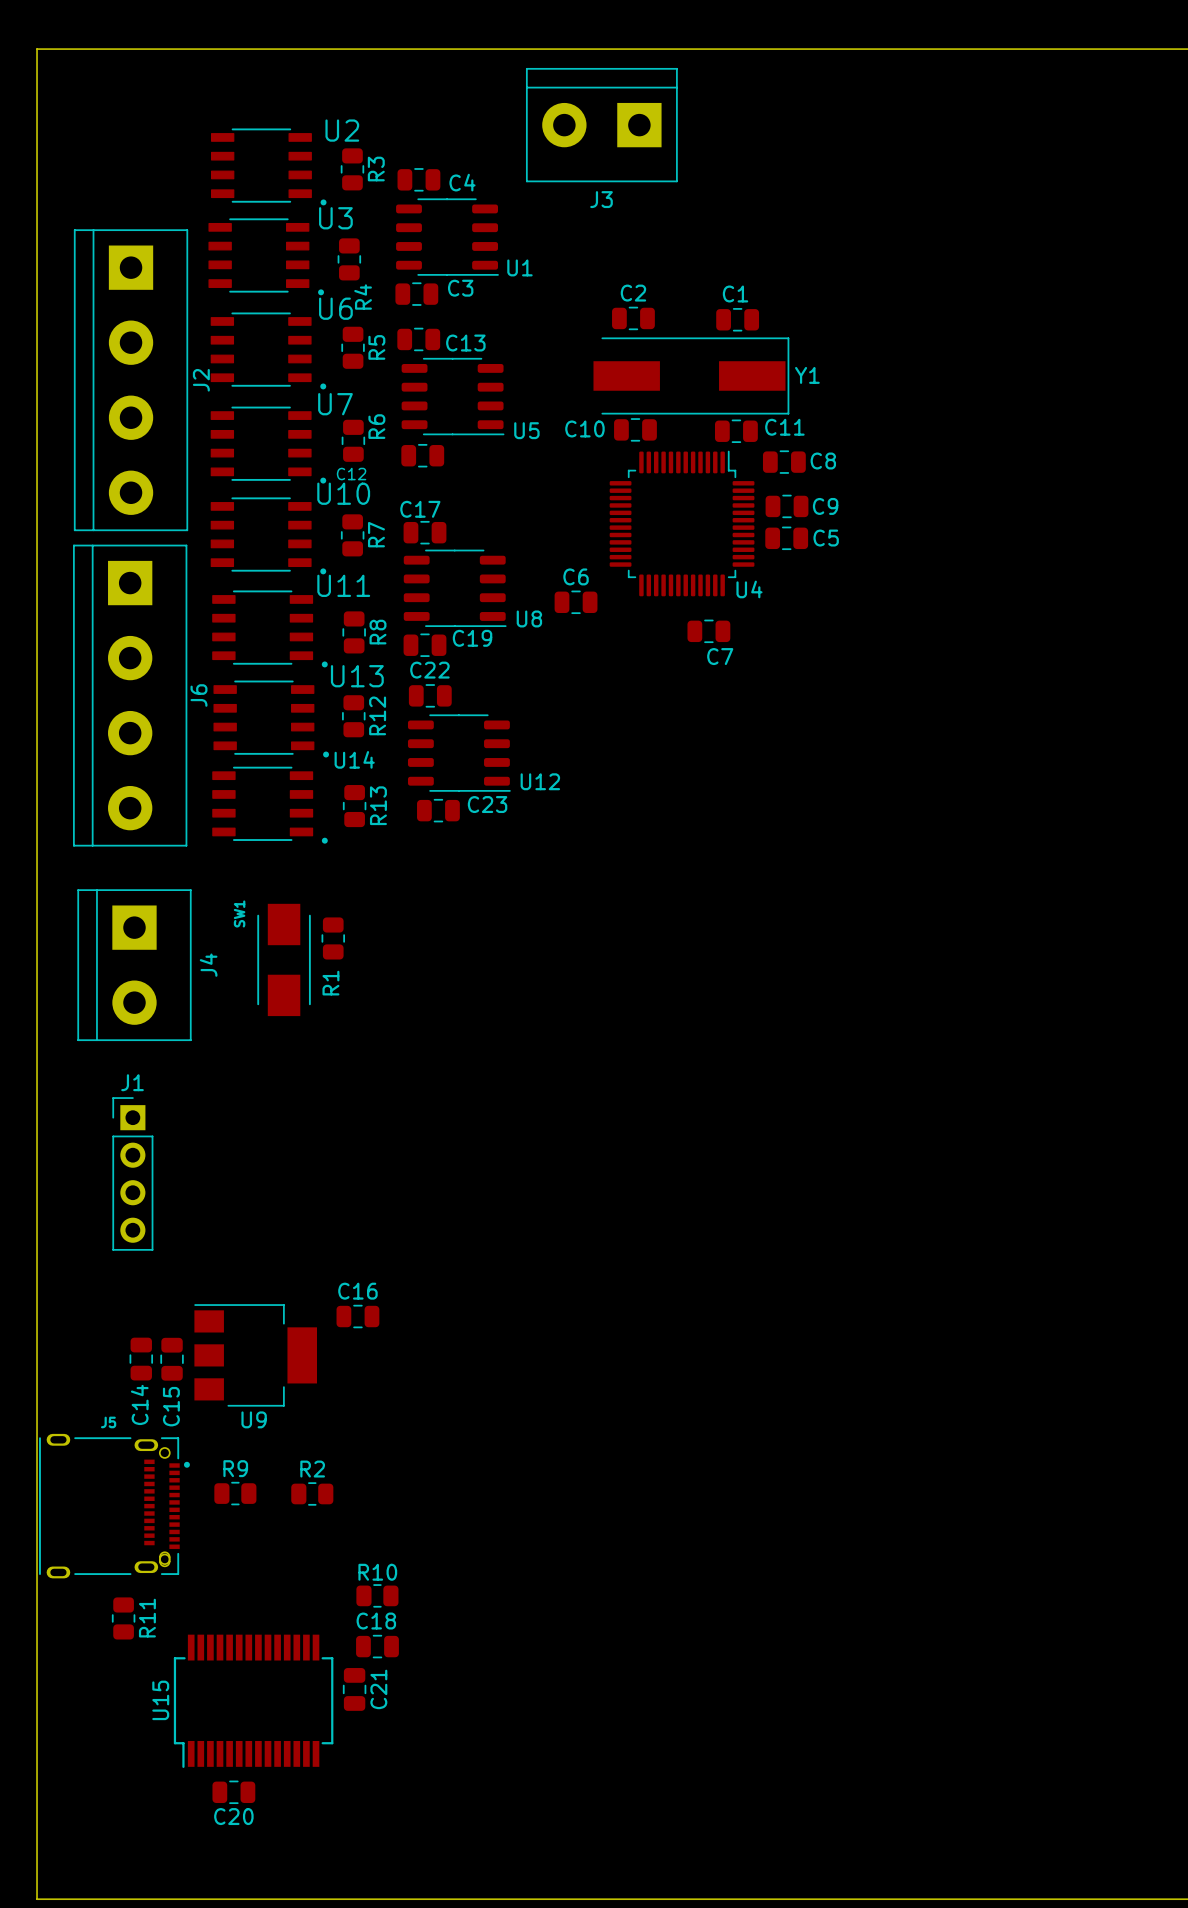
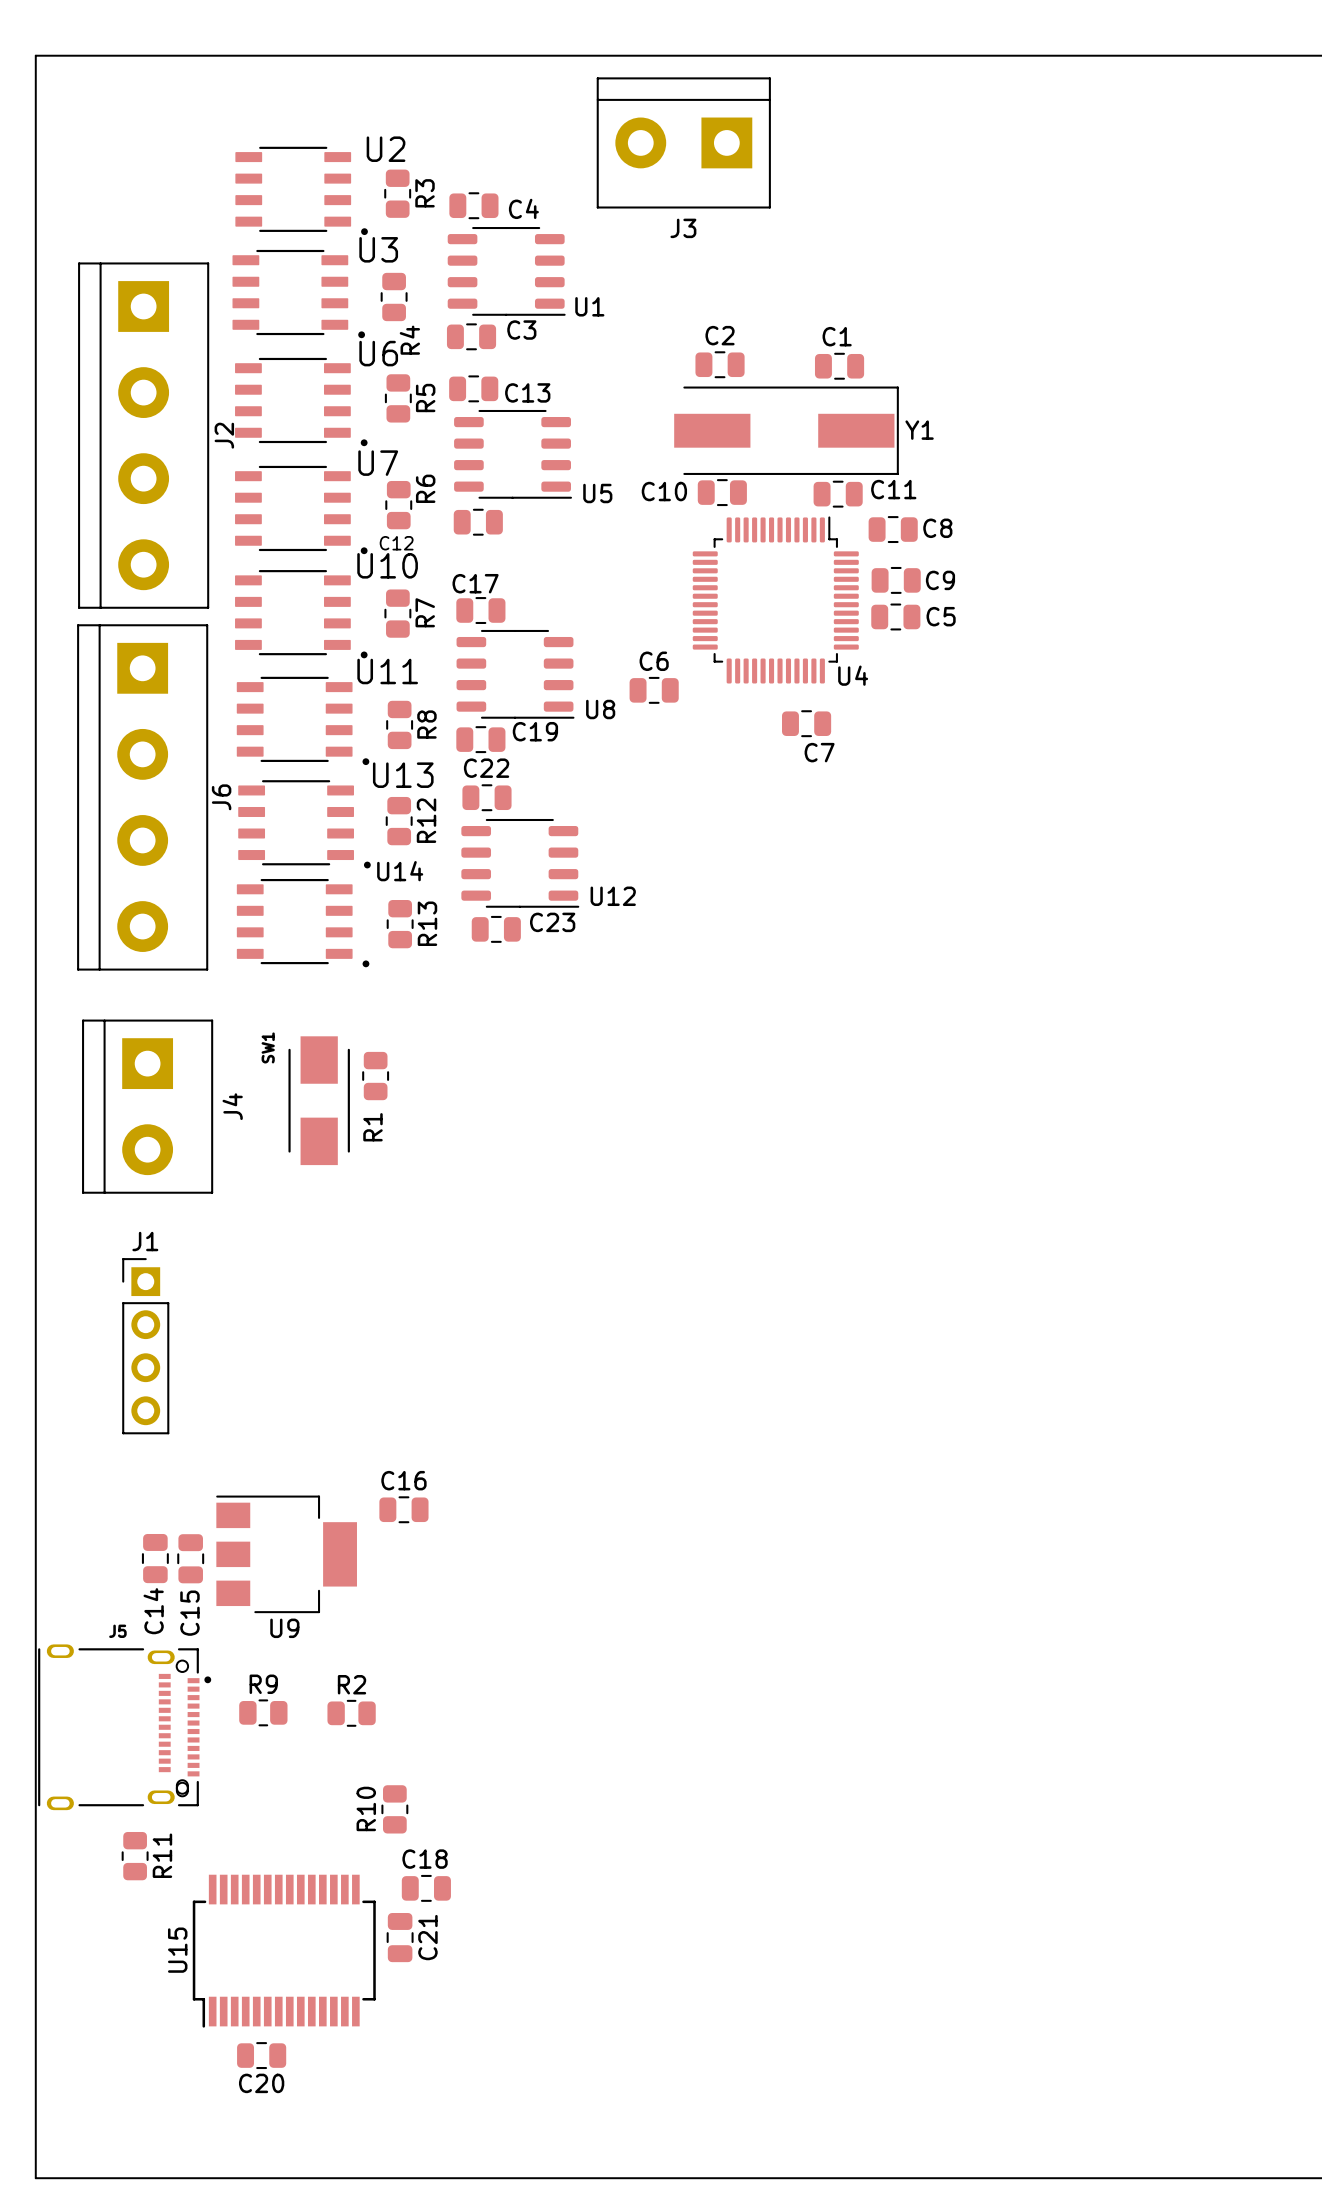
R10 name position: R10 (377, 1572) -> R10 (366, 1808)
R10 rotation: 0° (377, 1595) -> 90° clockwise (394, 1809)
R10 position: (377, 1595) -> (394, 1809)

